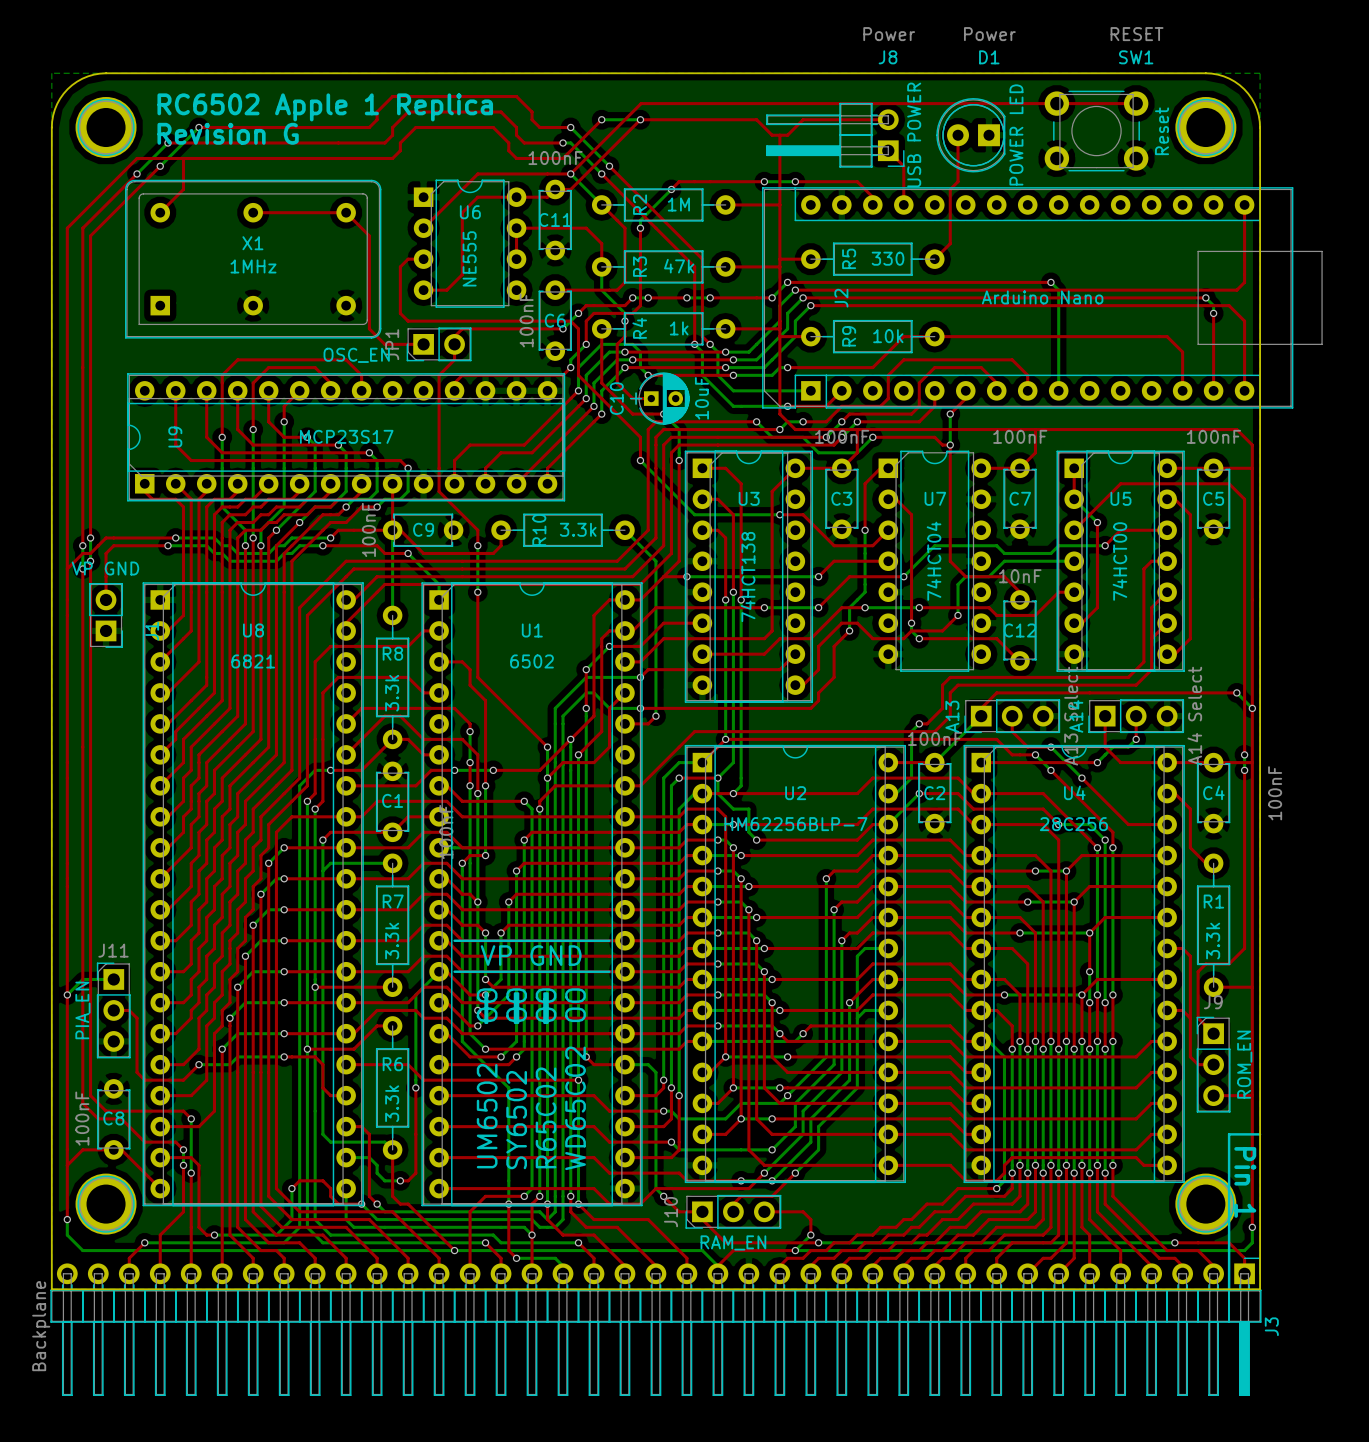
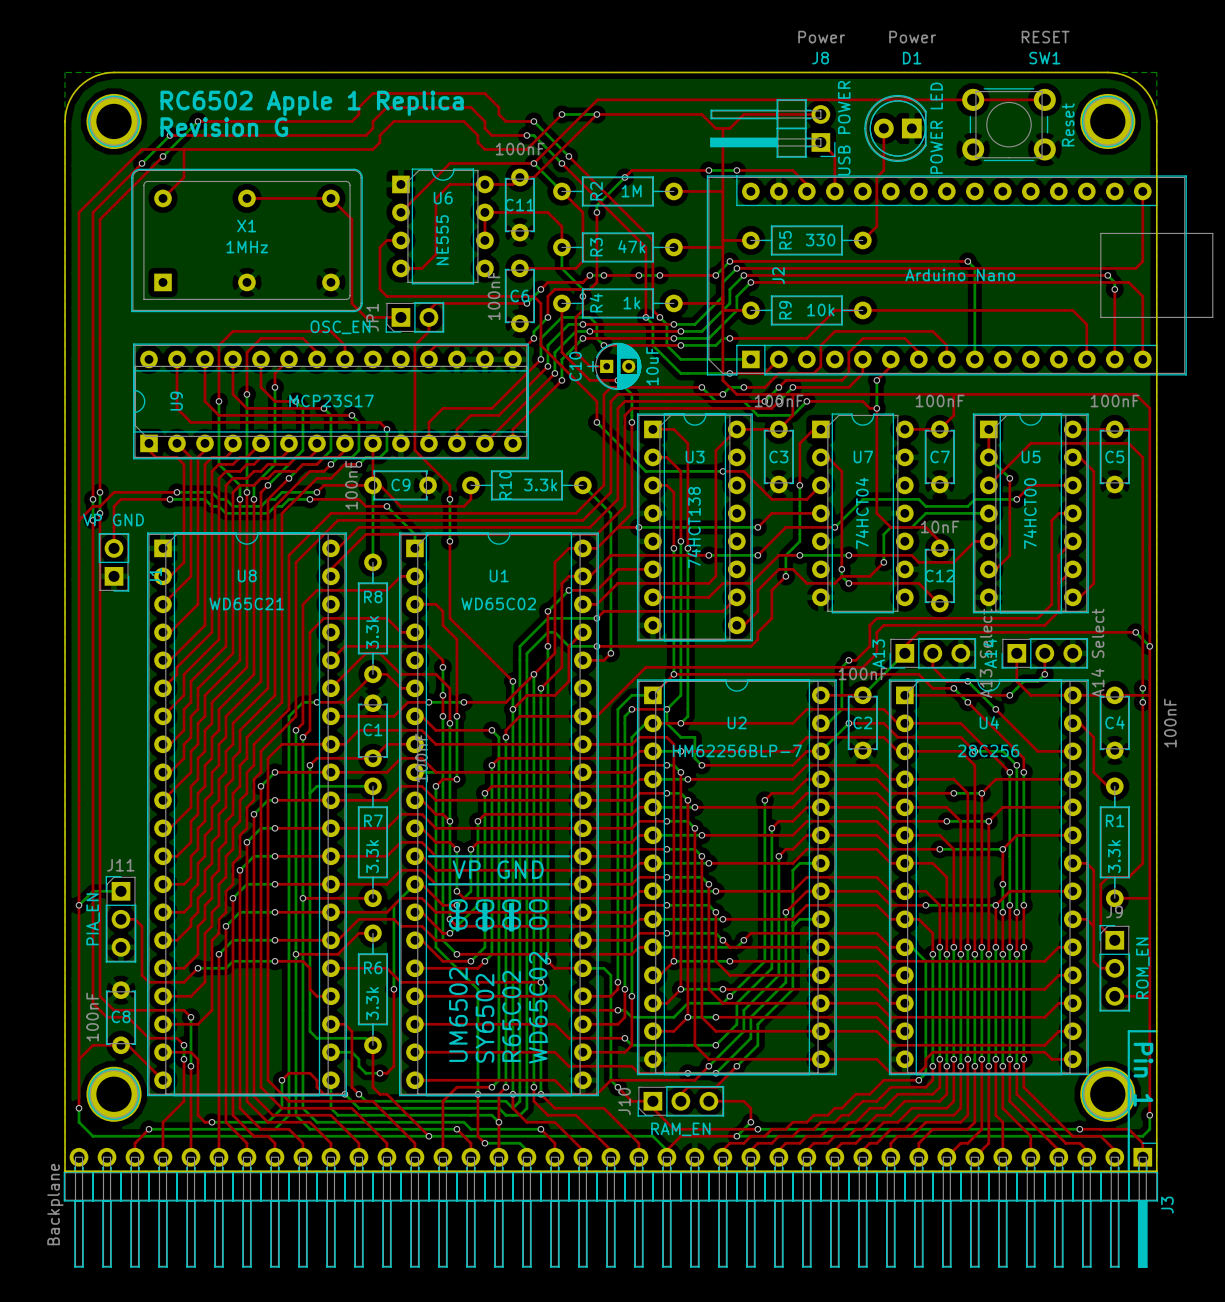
U8 value: 6821 (253, 661) -> WD65C21 (246, 603)
U1 value: 6502 (532, 661) -> WD65C02 (498, 603)

